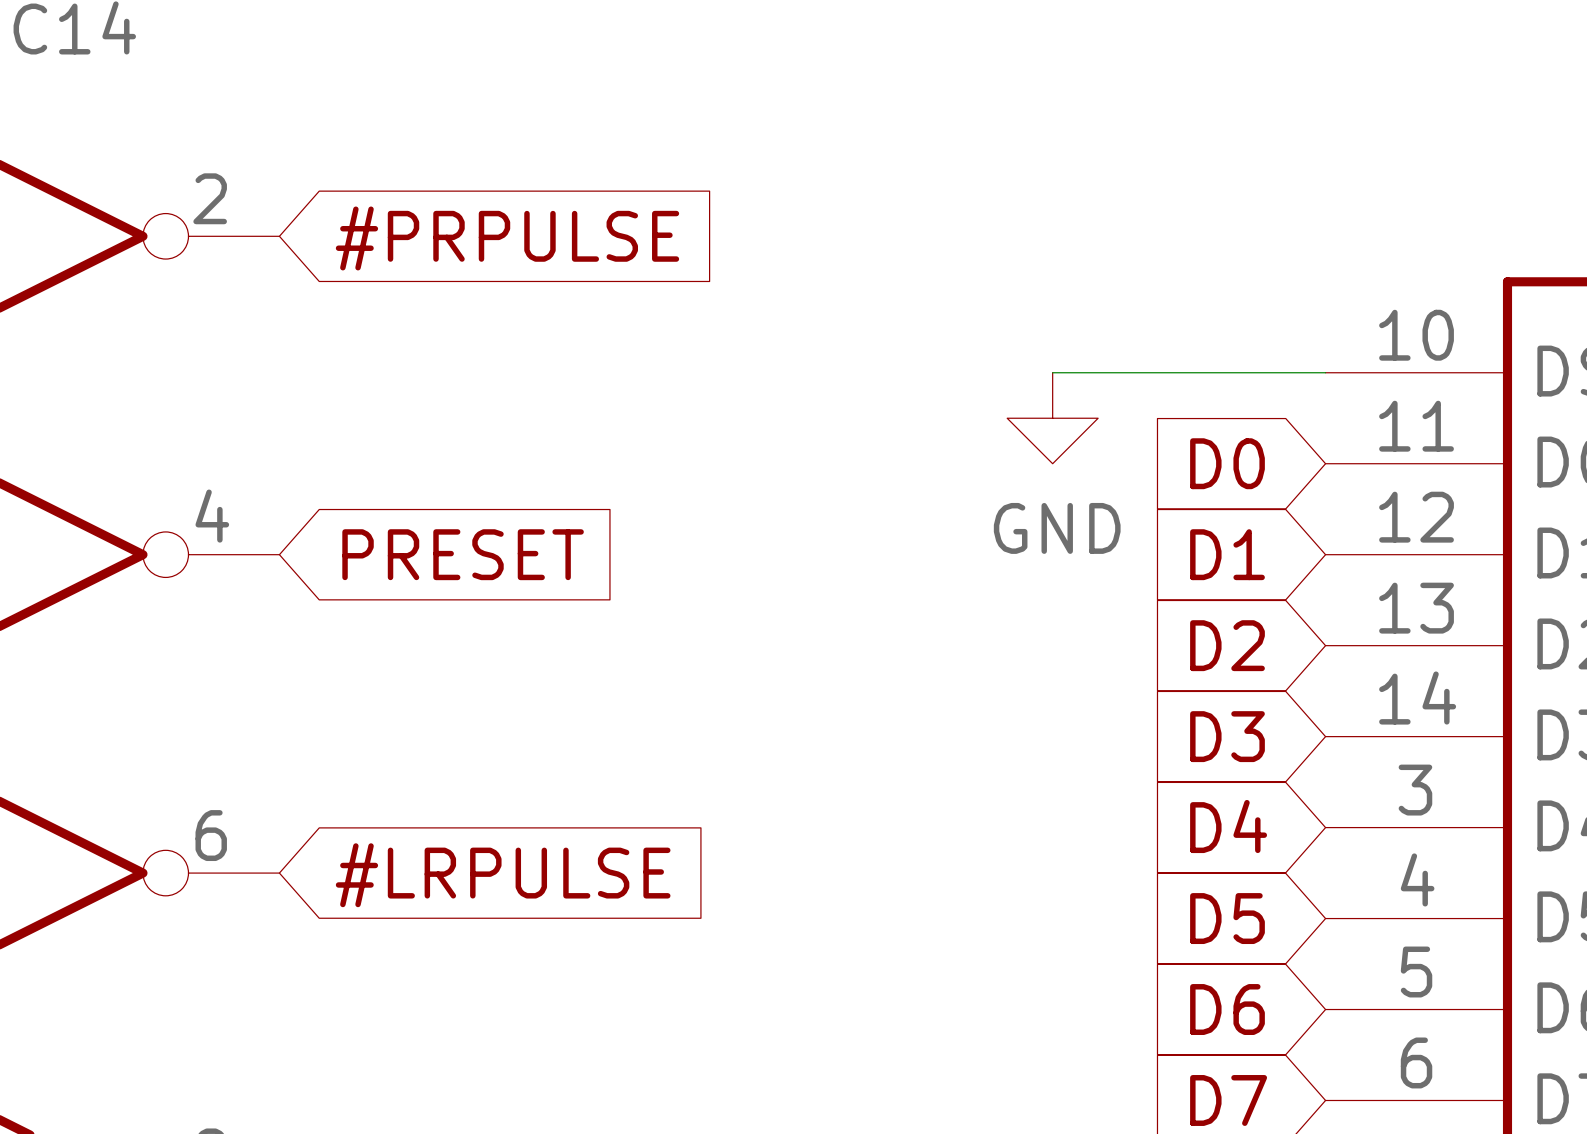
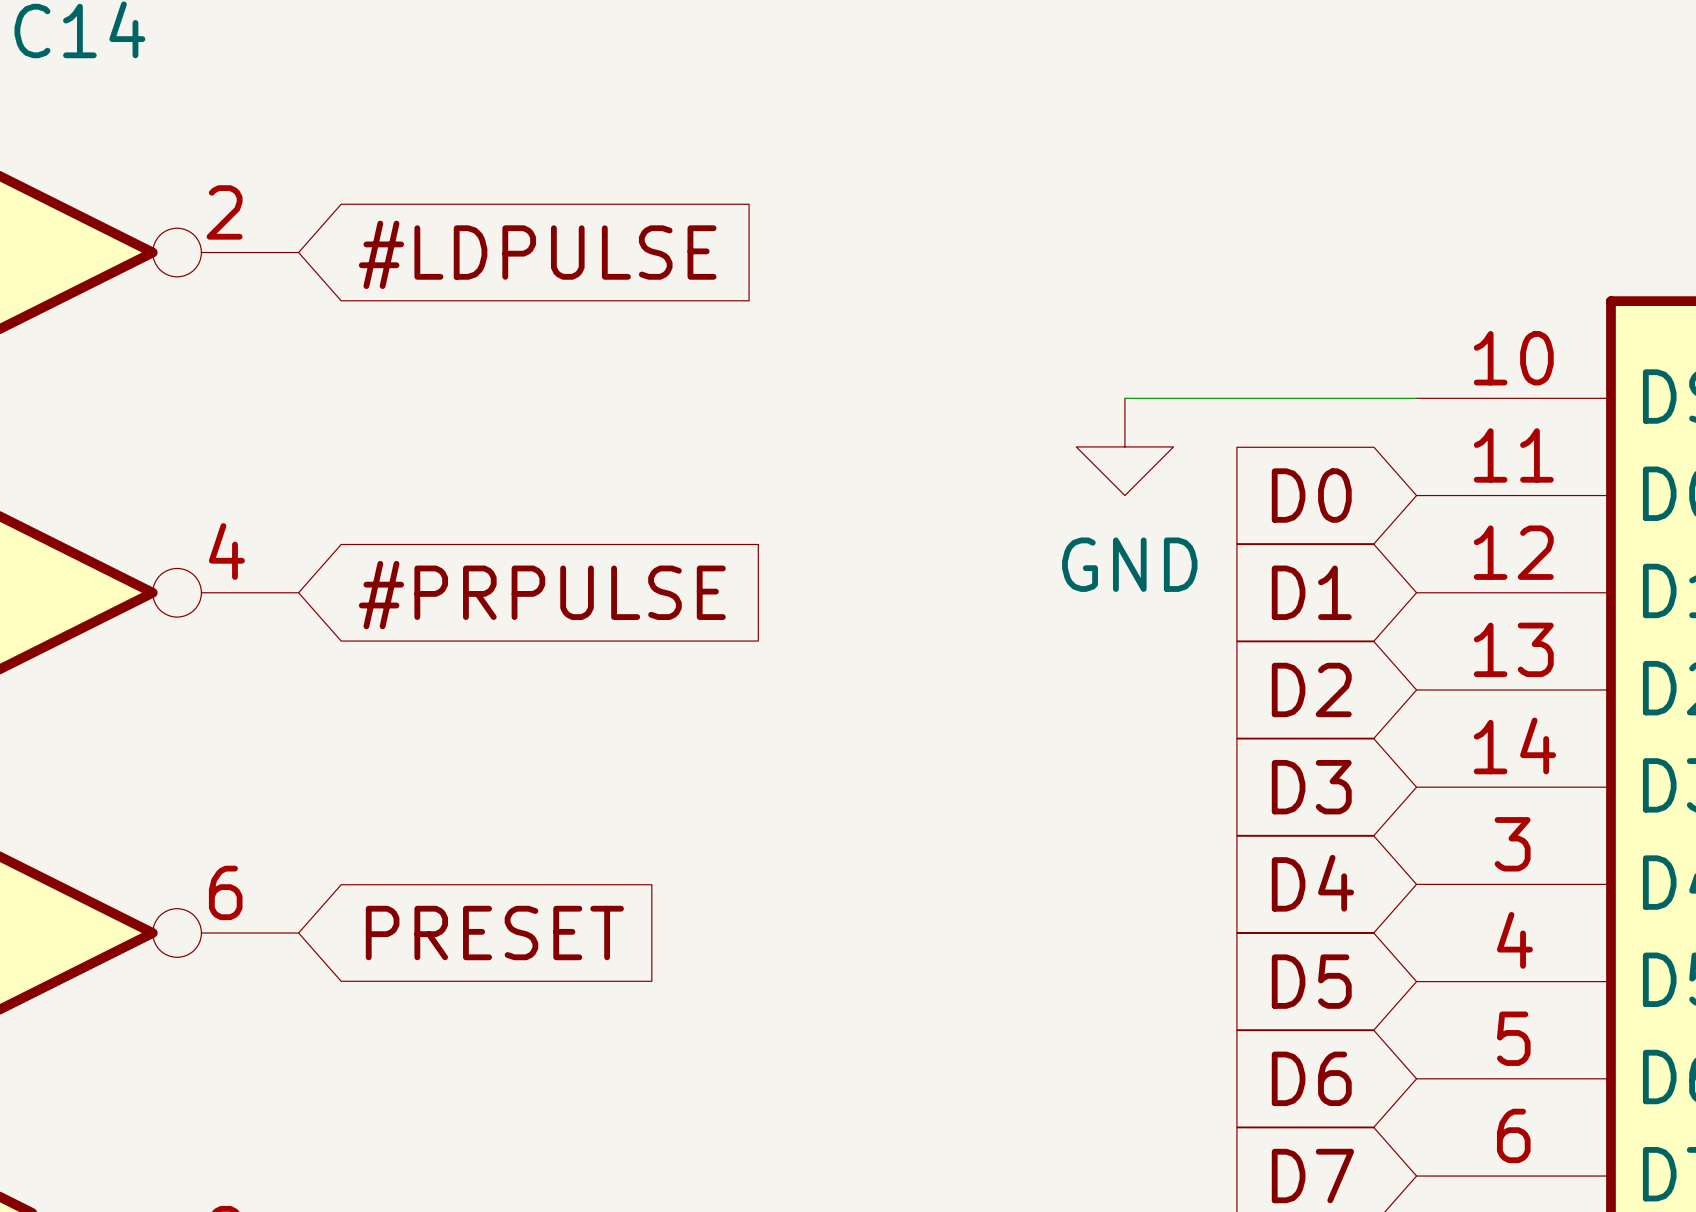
global label: #PRPULSE (507, 238) -> #LDPULSE (537, 254)
global label: PRESET (463, 554) -> #PRPULSE (542, 595)
global label: #LRPULSE (503, 875) -> PRESET (494, 933)

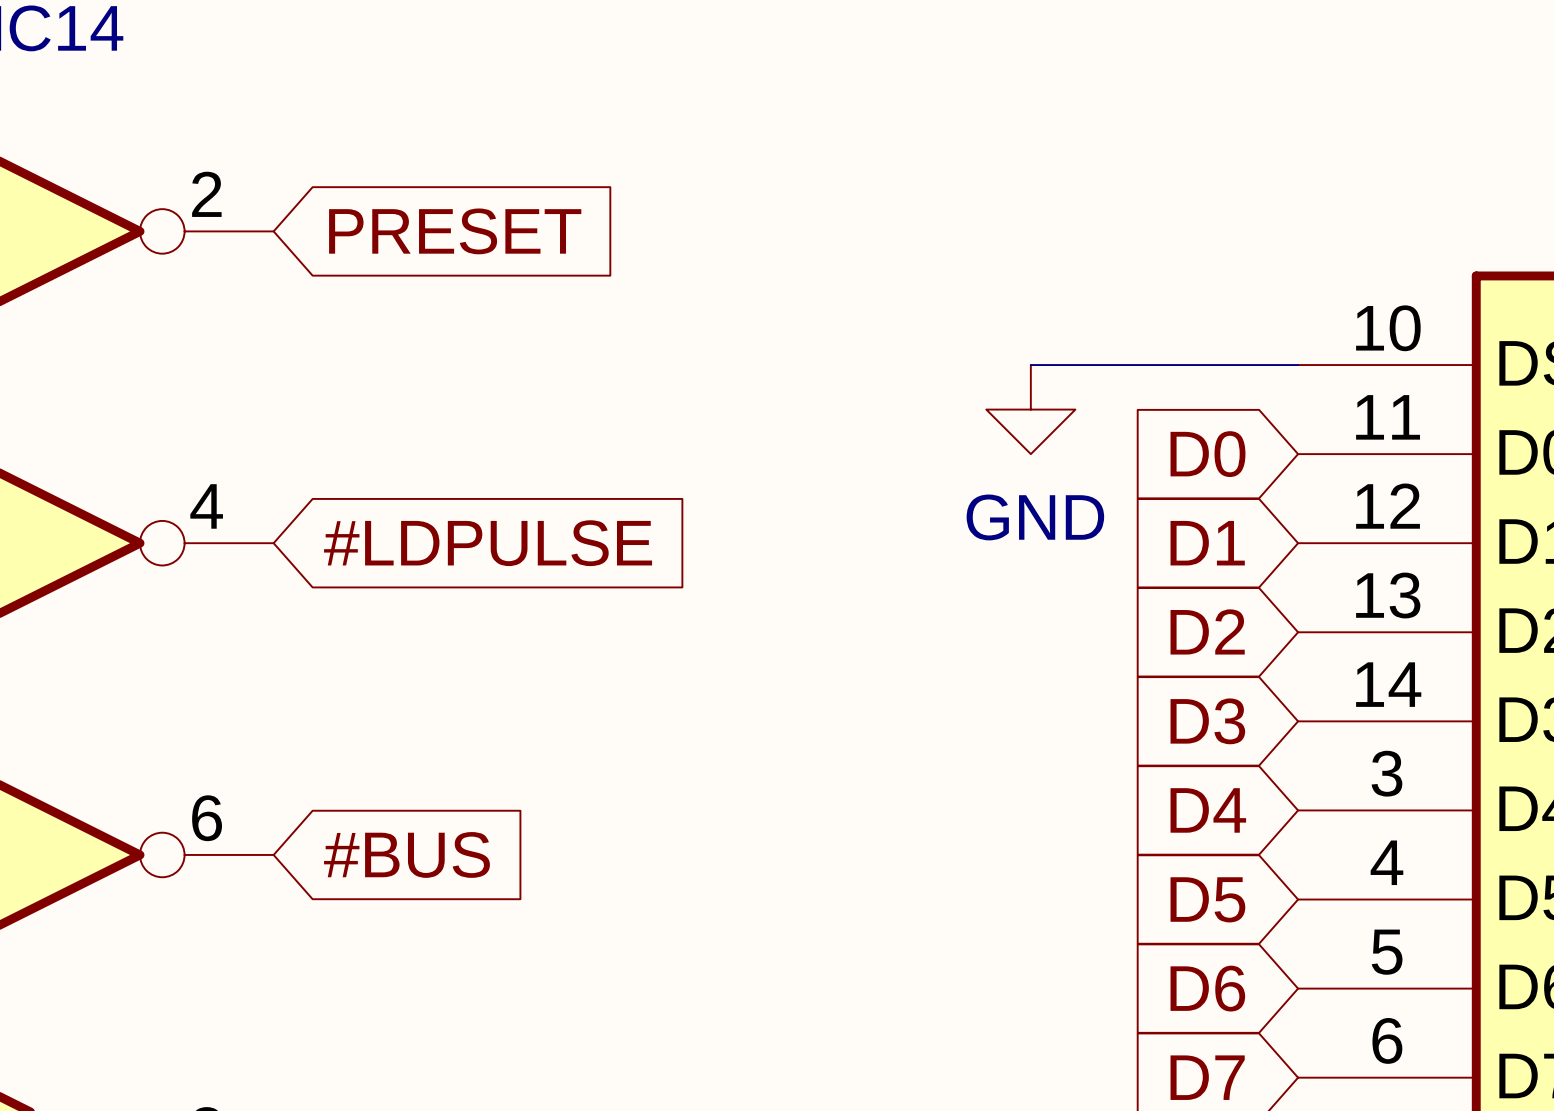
global label: #LDPULSE (537, 254) -> PRESET (455, 231)
global label: #PRPULSE (542, 595) -> #LDPULSE (488, 543)
global label: PRESET (494, 933) -> #BUS (406, 854)

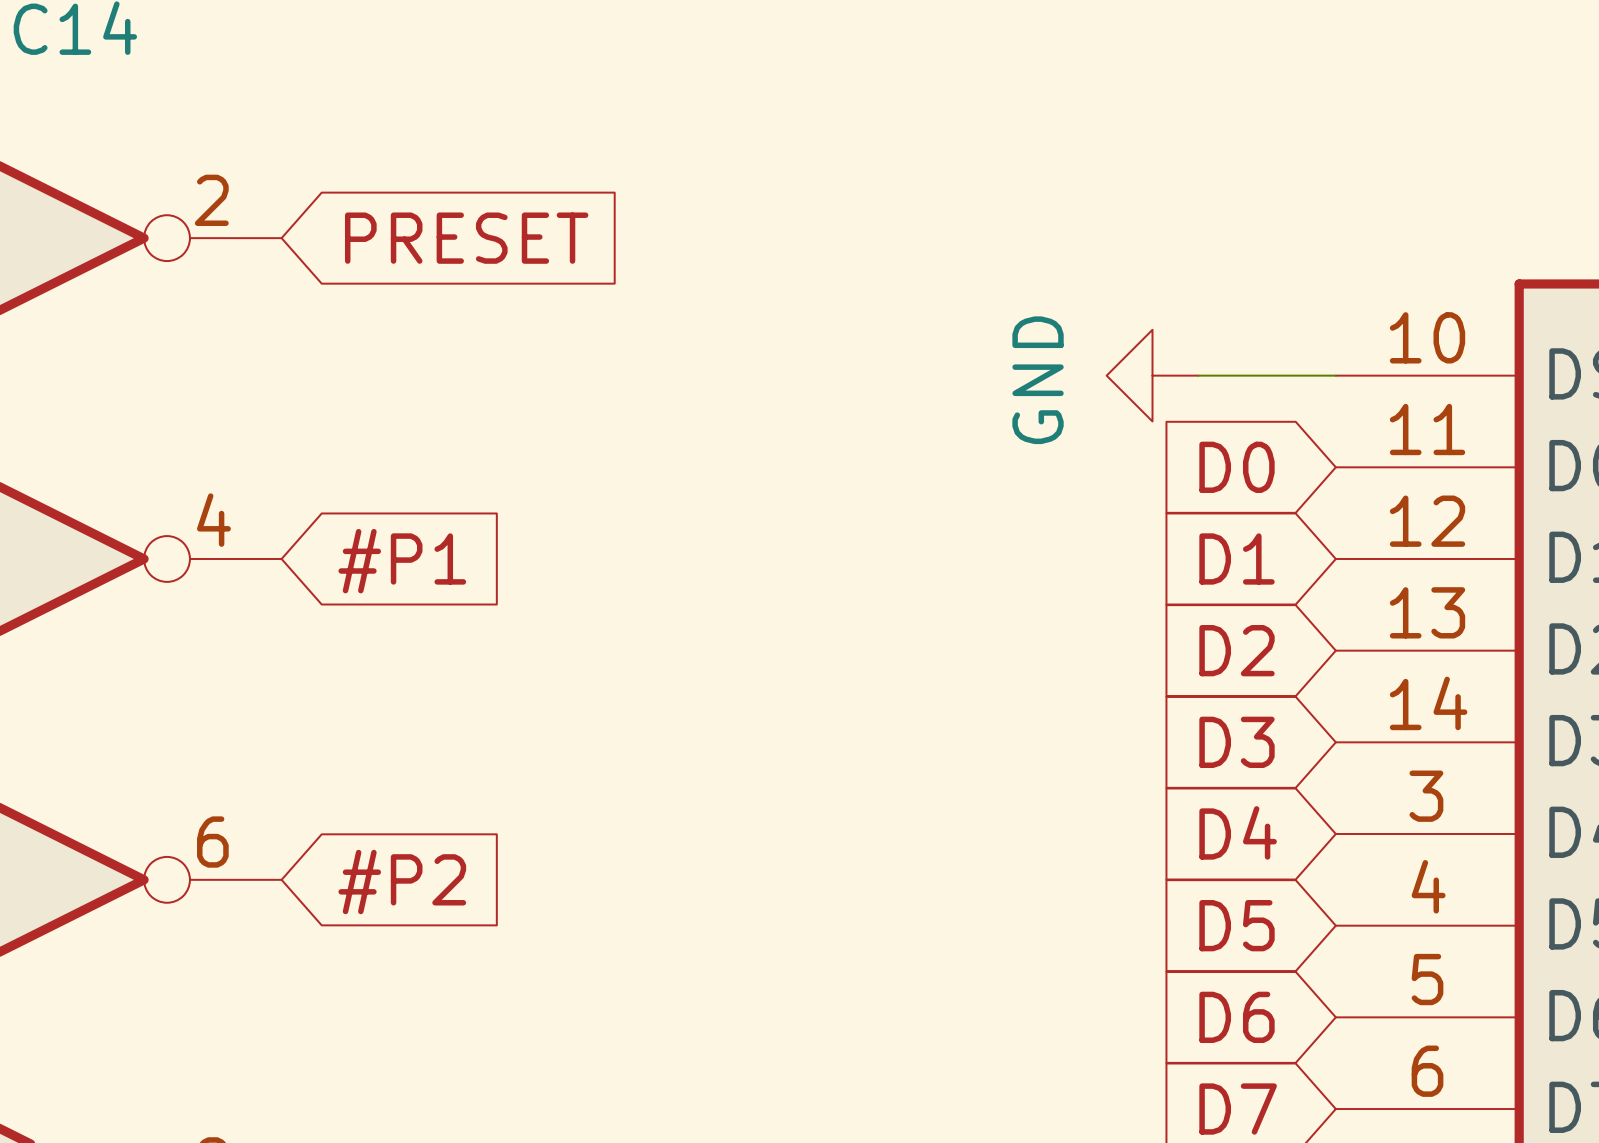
wire: (1030, 365) (1164, 365) -> none
power symbol rotation: 0° (1030, 409) -> 90° clockwise (1152, 375)
power symbol position: GND (1030, 409) -> GND (1152, 375)
global label: #LDPULSE (488, 543) -> #P1 (402, 561)
global label: #BUS (406, 854) -> #P2 (402, 882)

